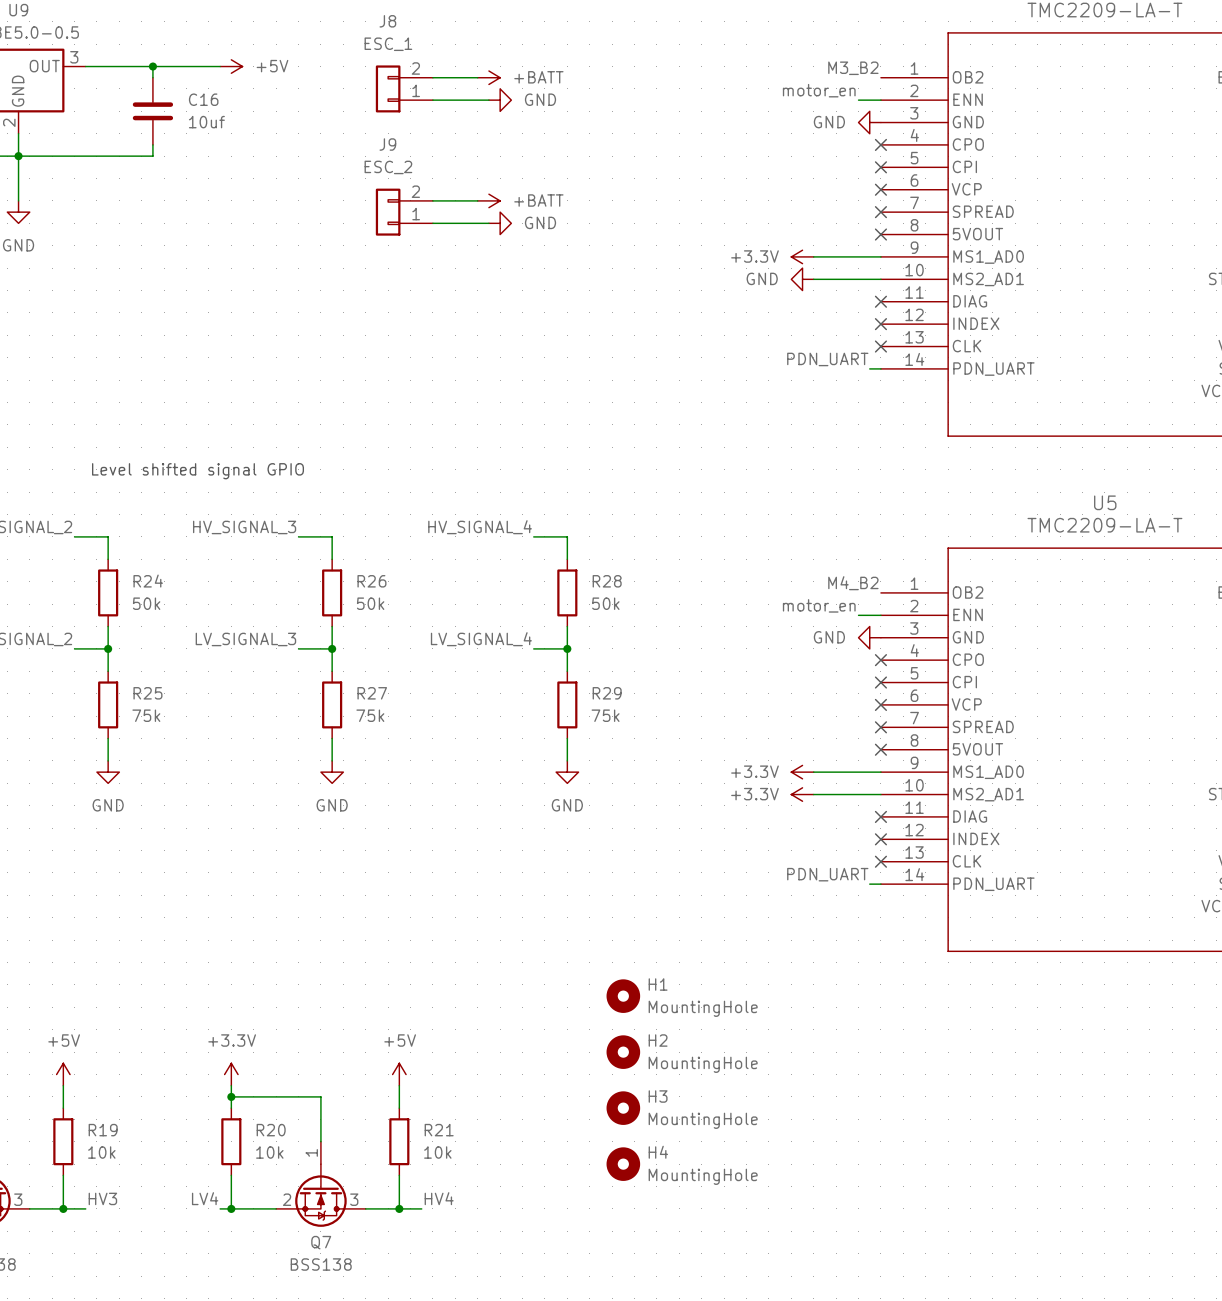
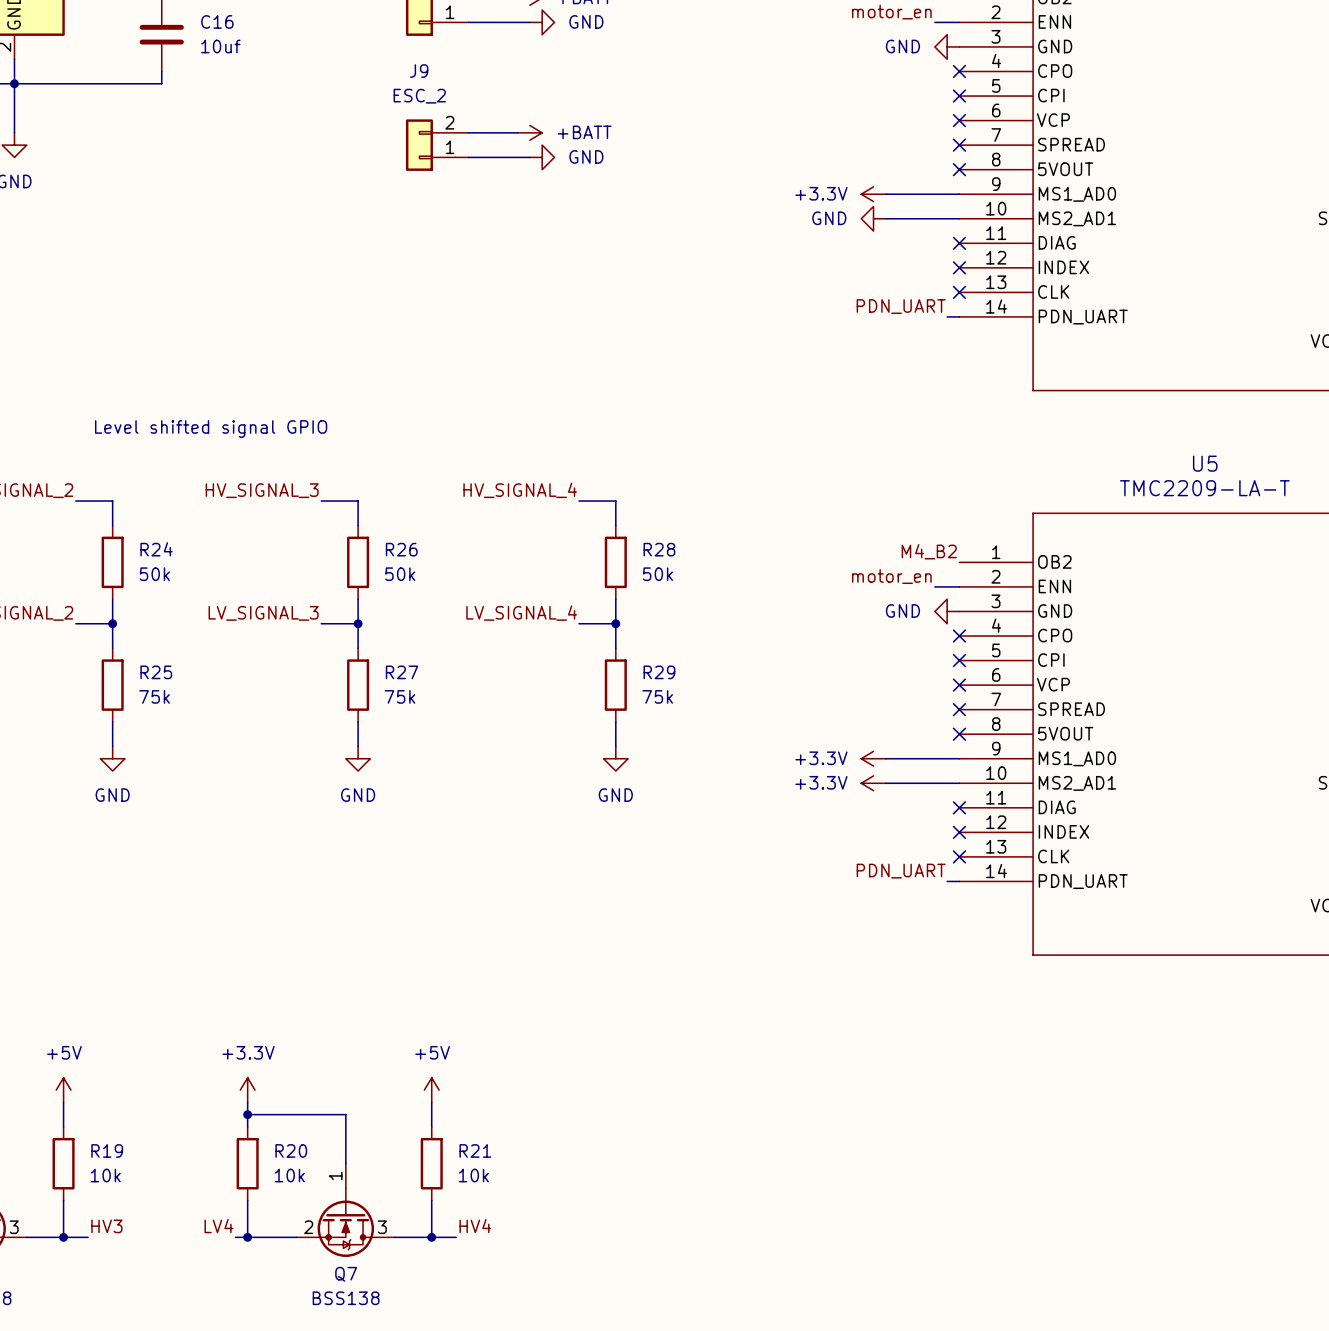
H1: MountingHole (623, 996) -> none
H2: MountingHole (623, 1052) -> none
H3: MountingHole (623, 1108) -> none
H4: MountingHole (623, 1164) -> none

